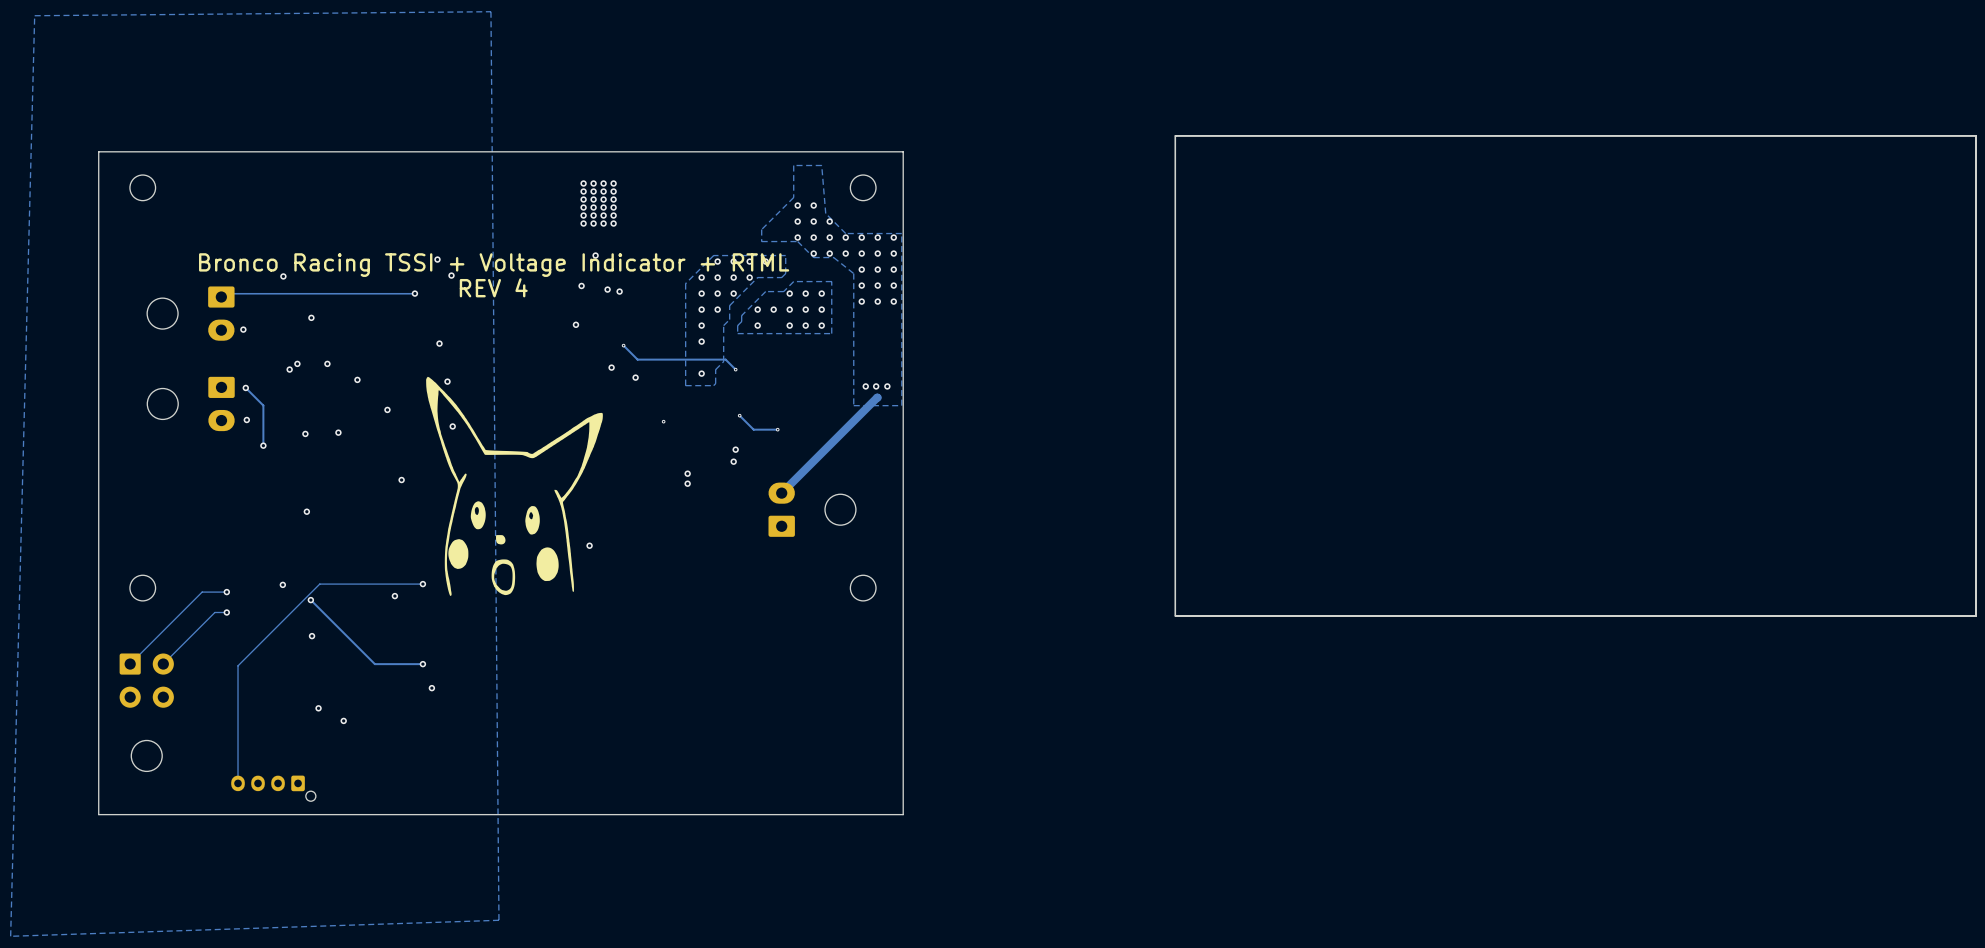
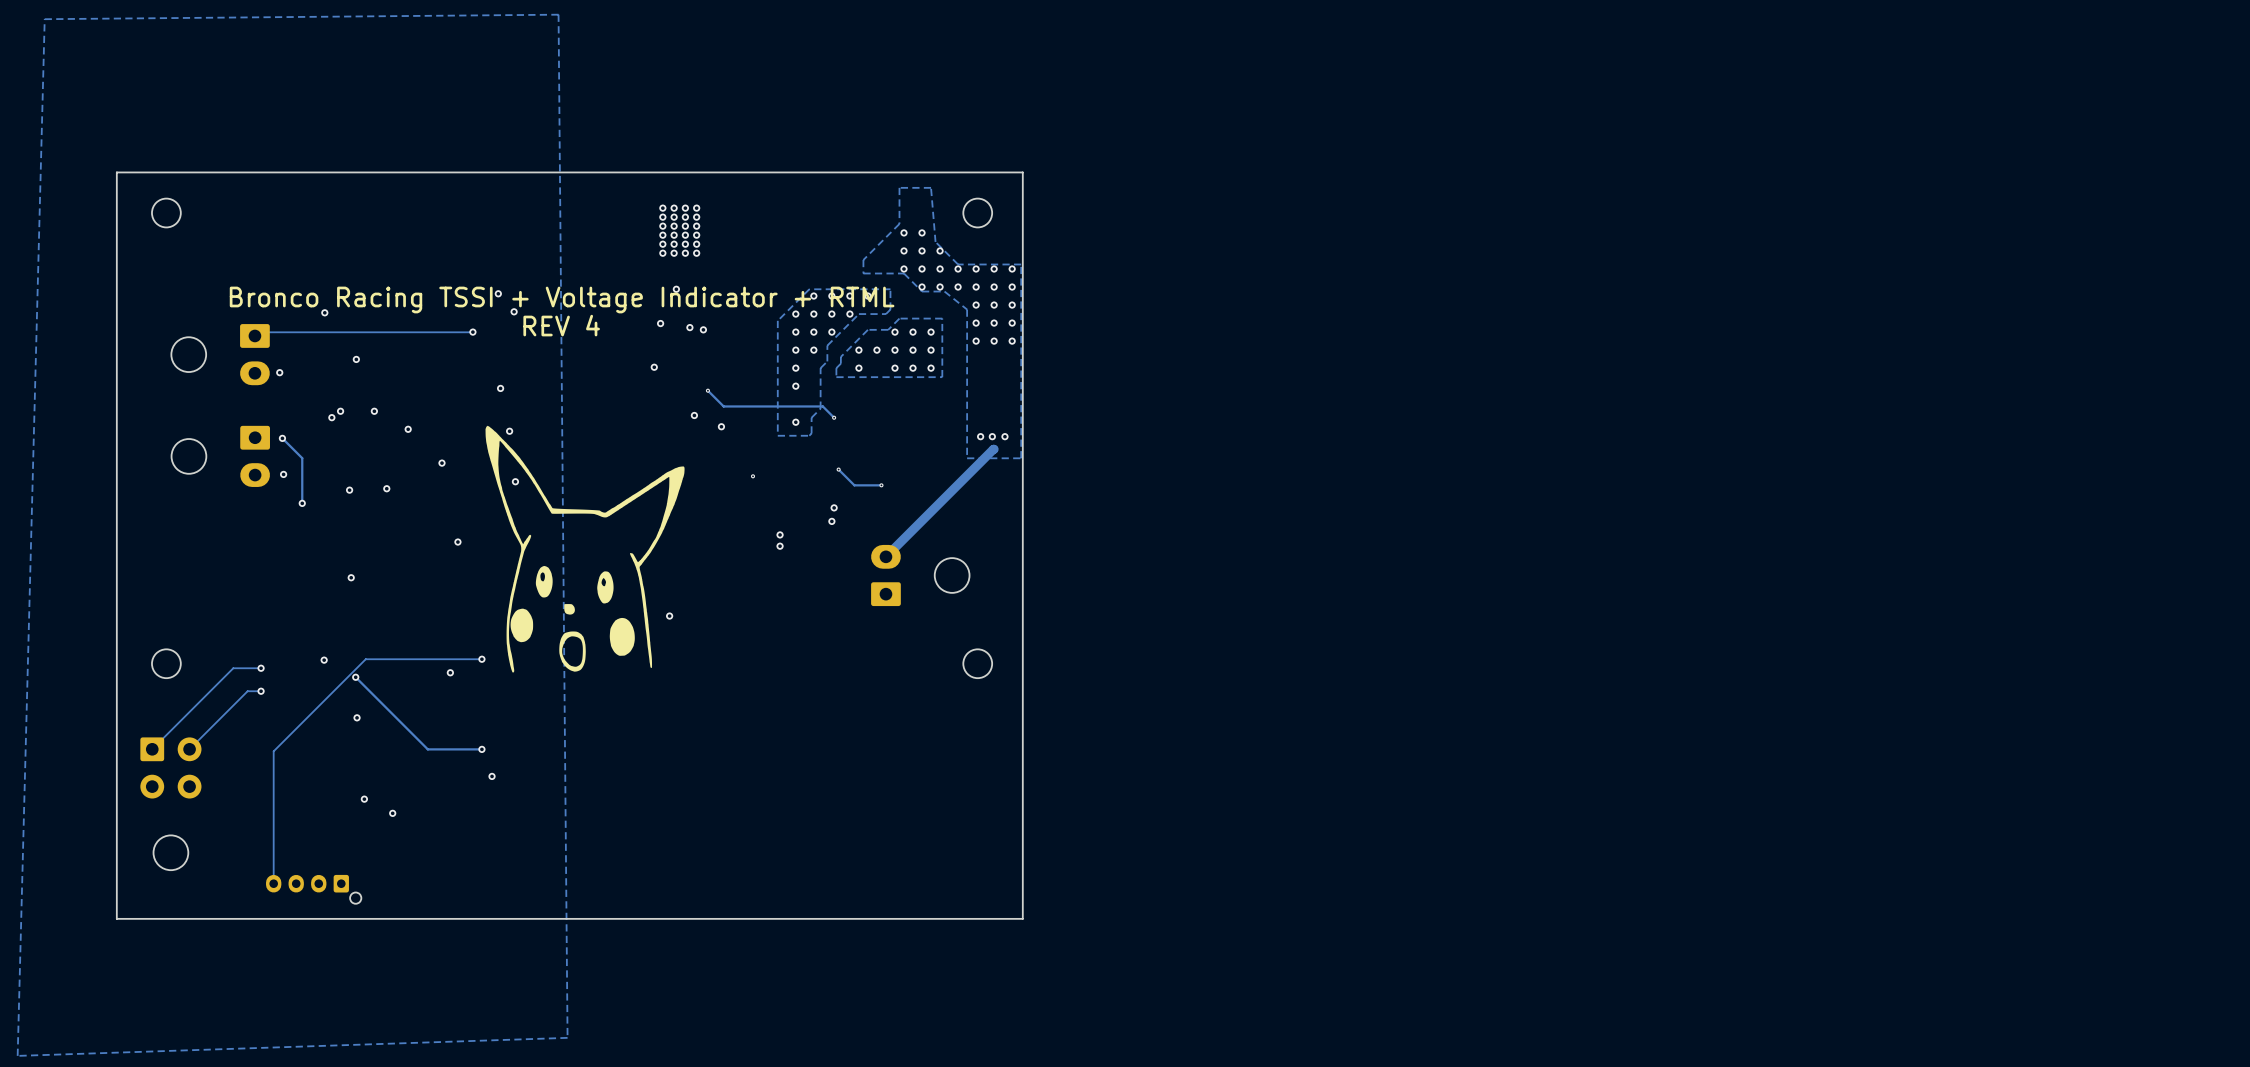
board edge: (1975, 135) (1175, 135) (1175, 616) (1975, 616) (1975, 135) -> none

